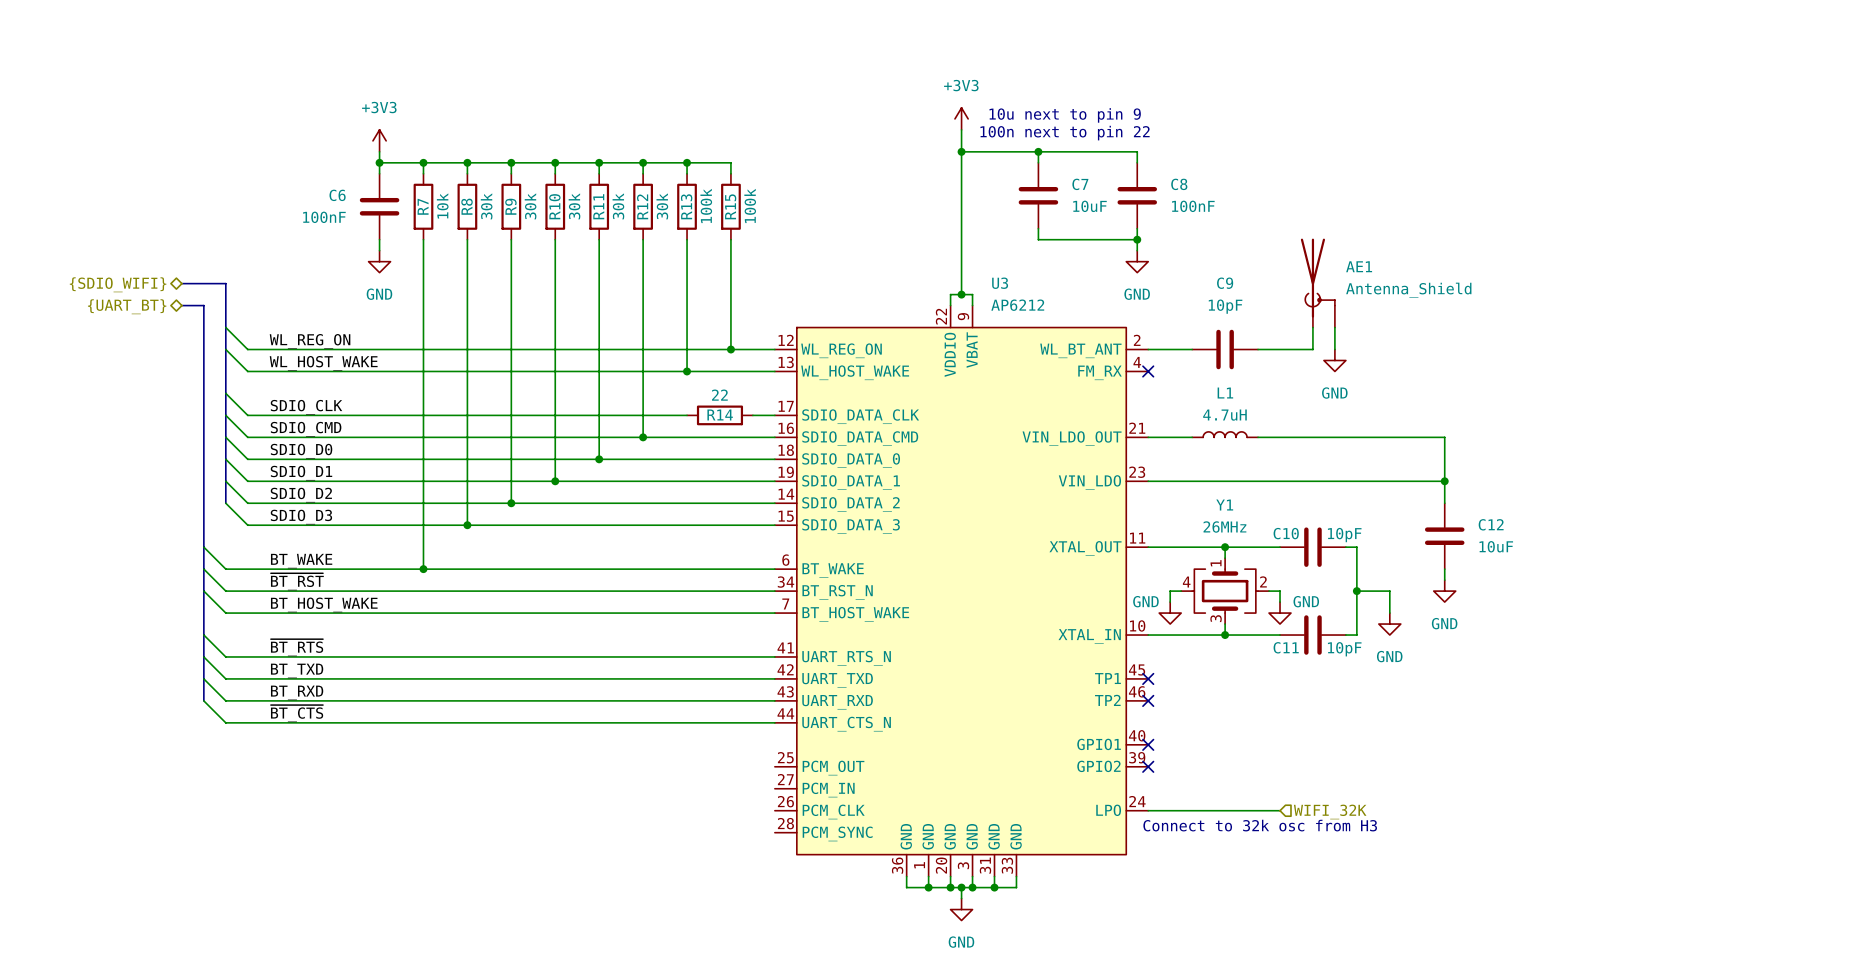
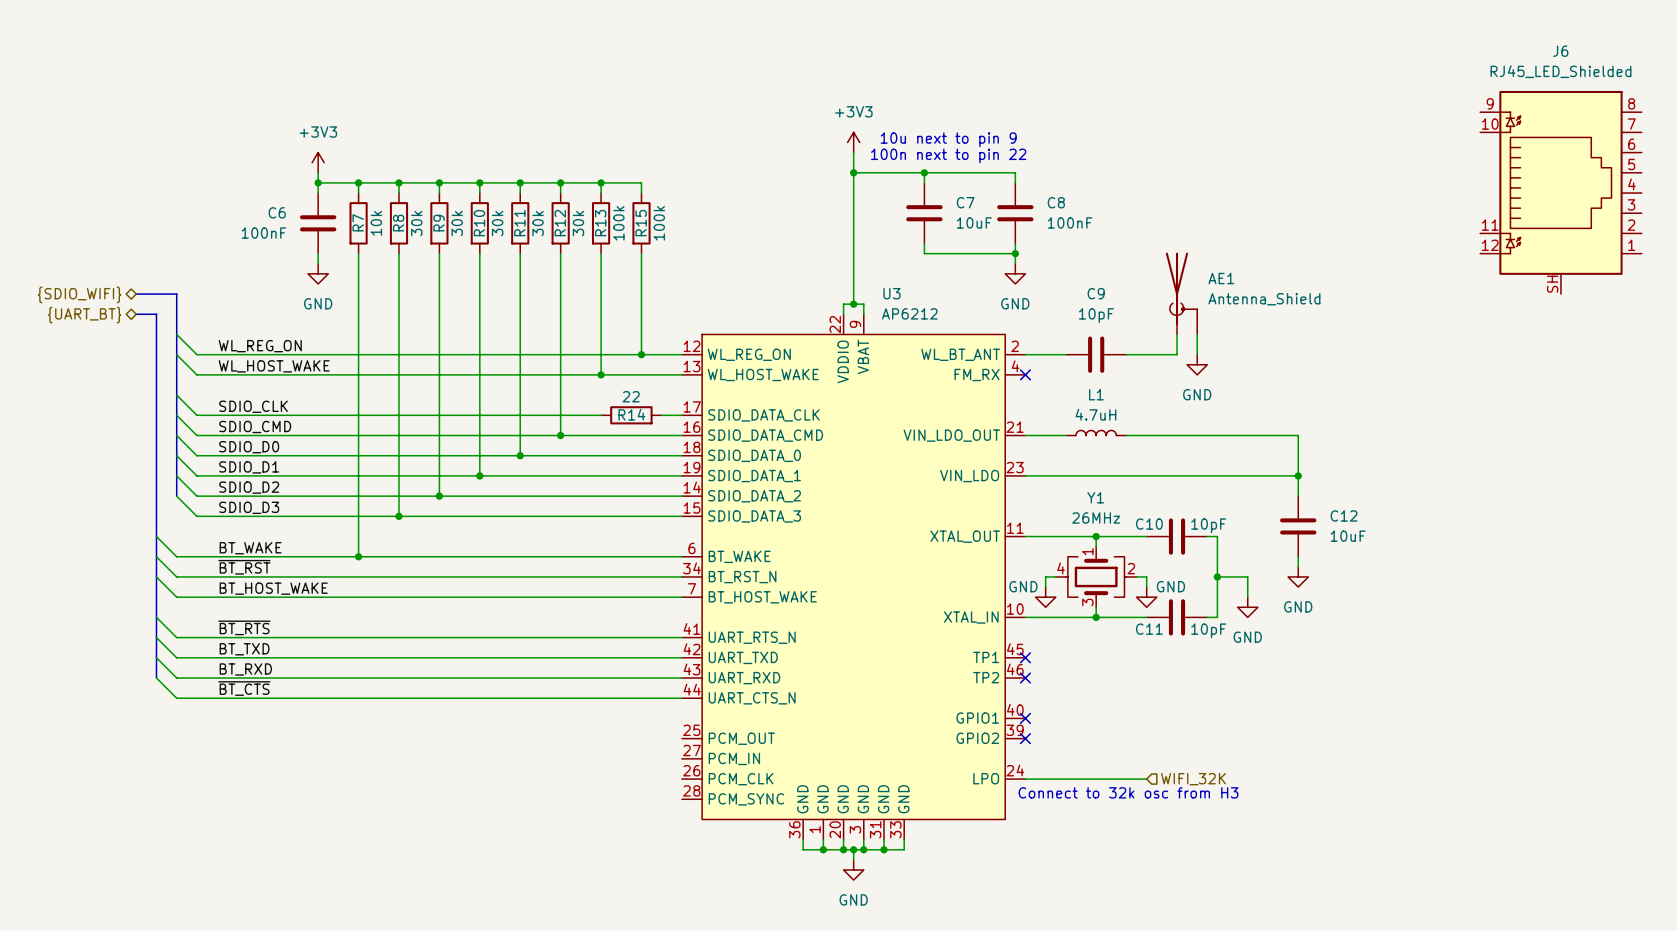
J6: none -> RJ45_LED_Shielded (1560, 192)

